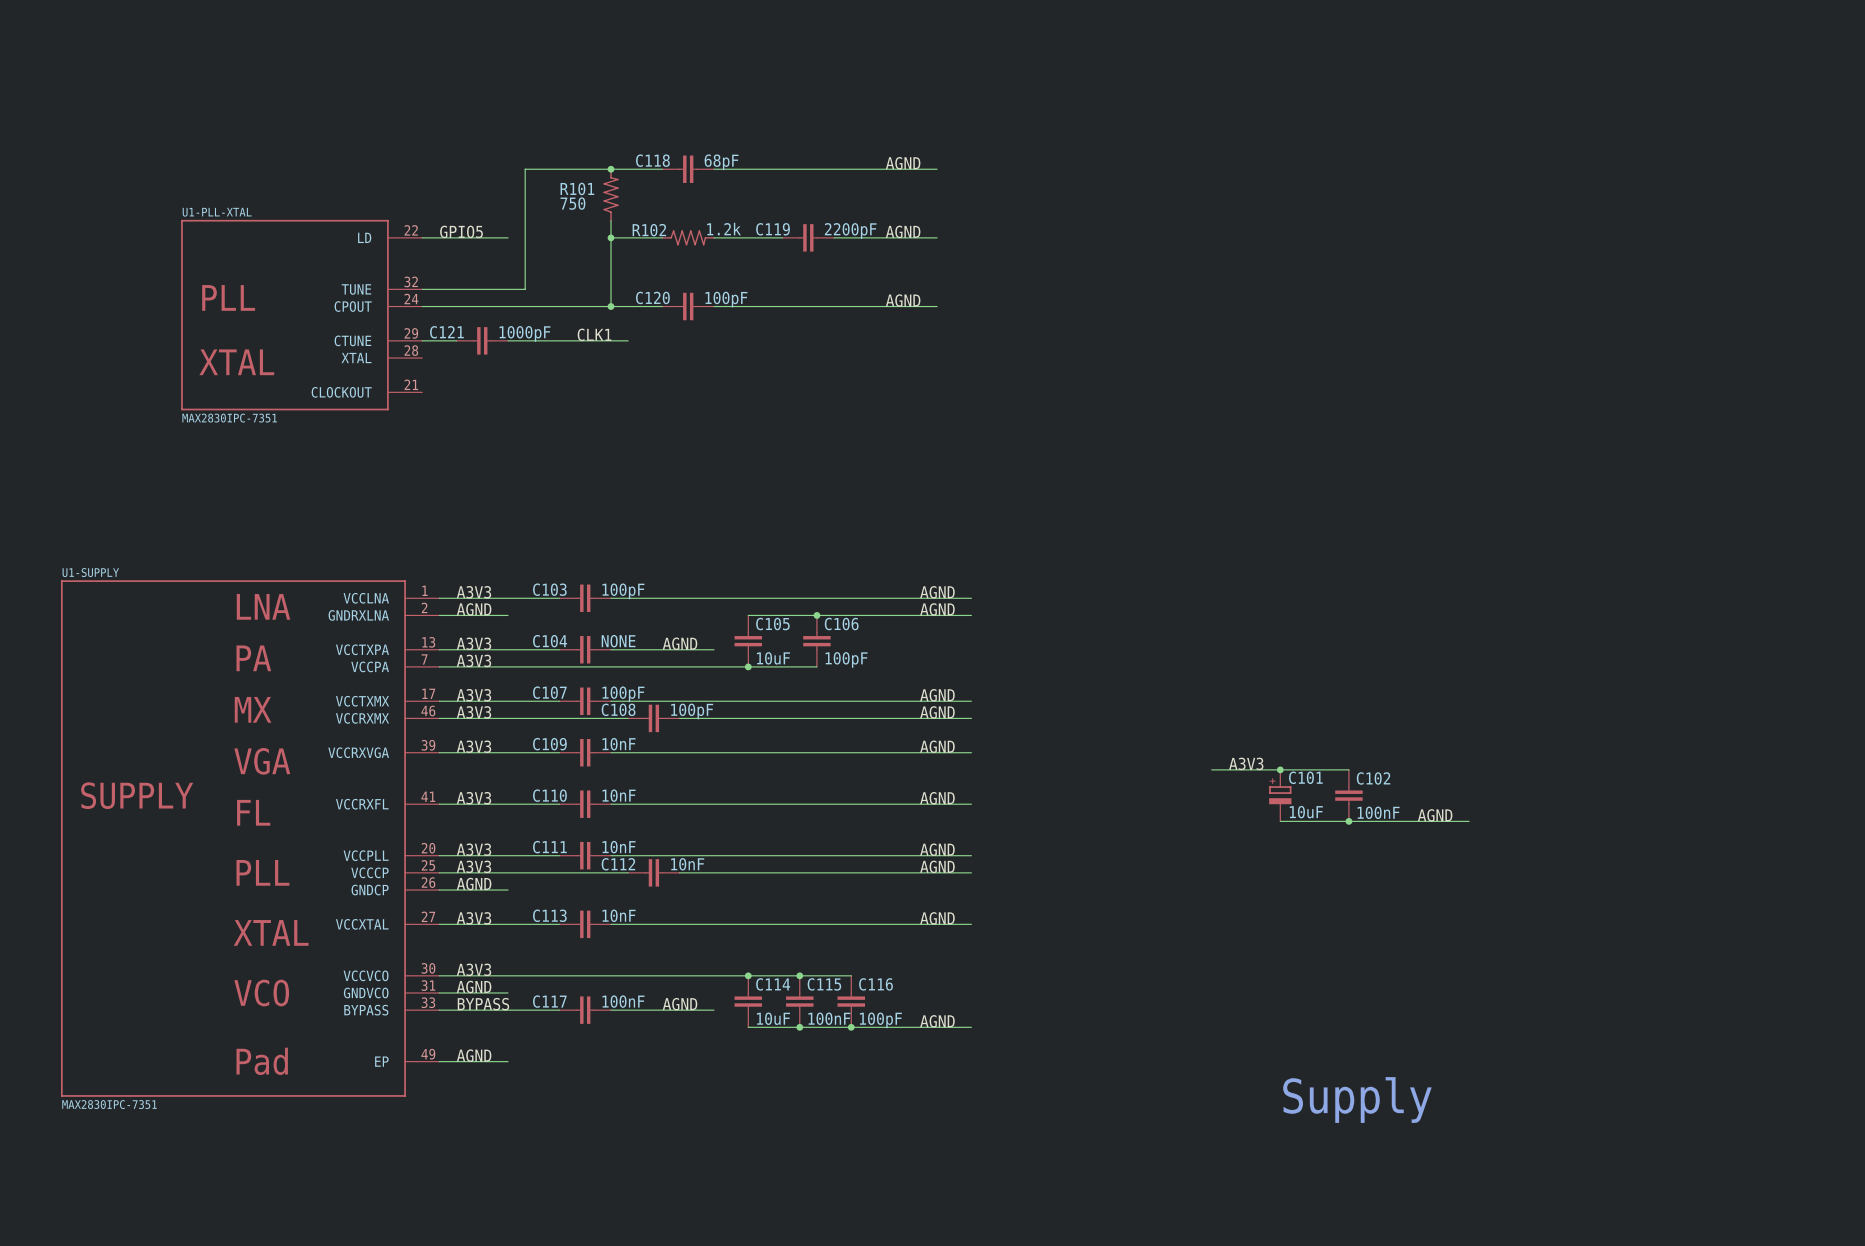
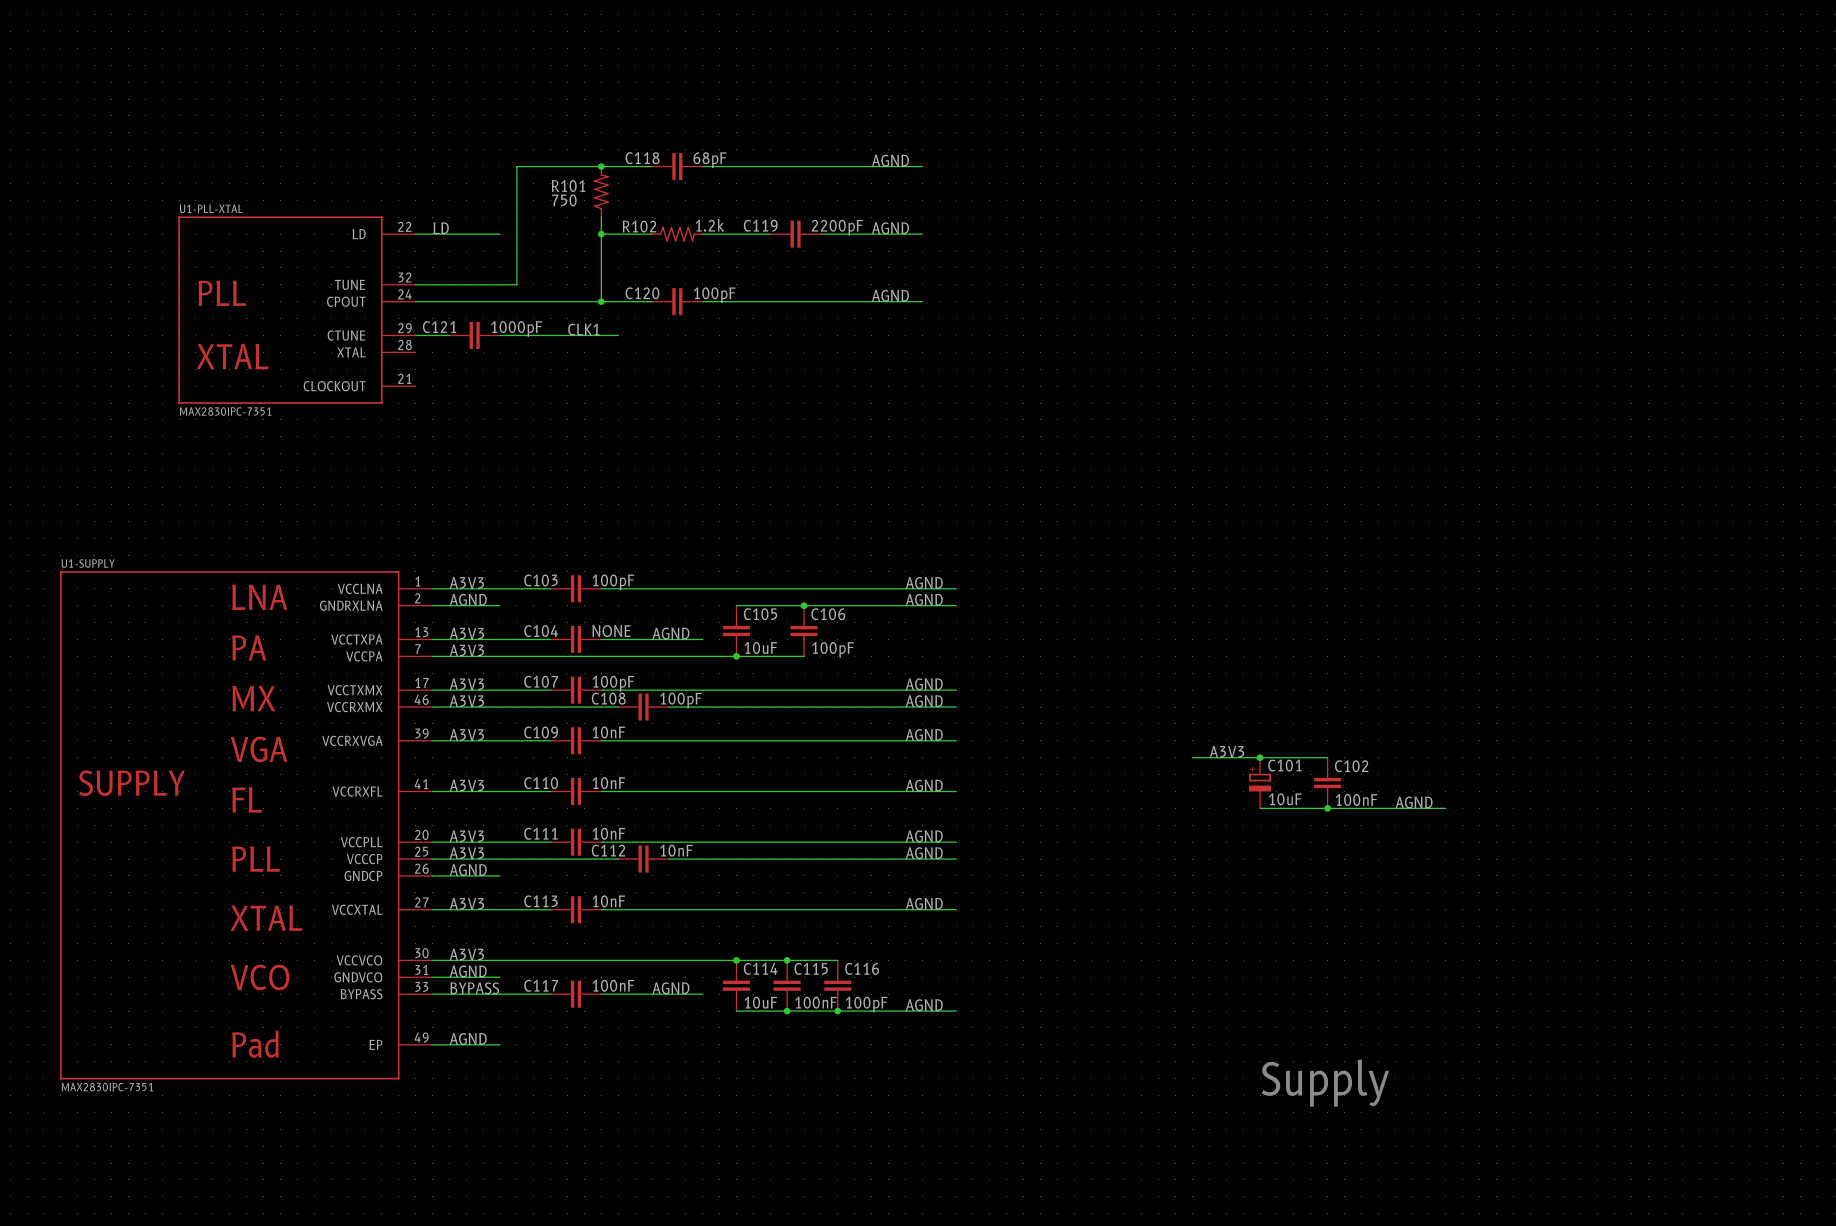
label: GPIO5 (461, 231) -> LD (441, 228)

